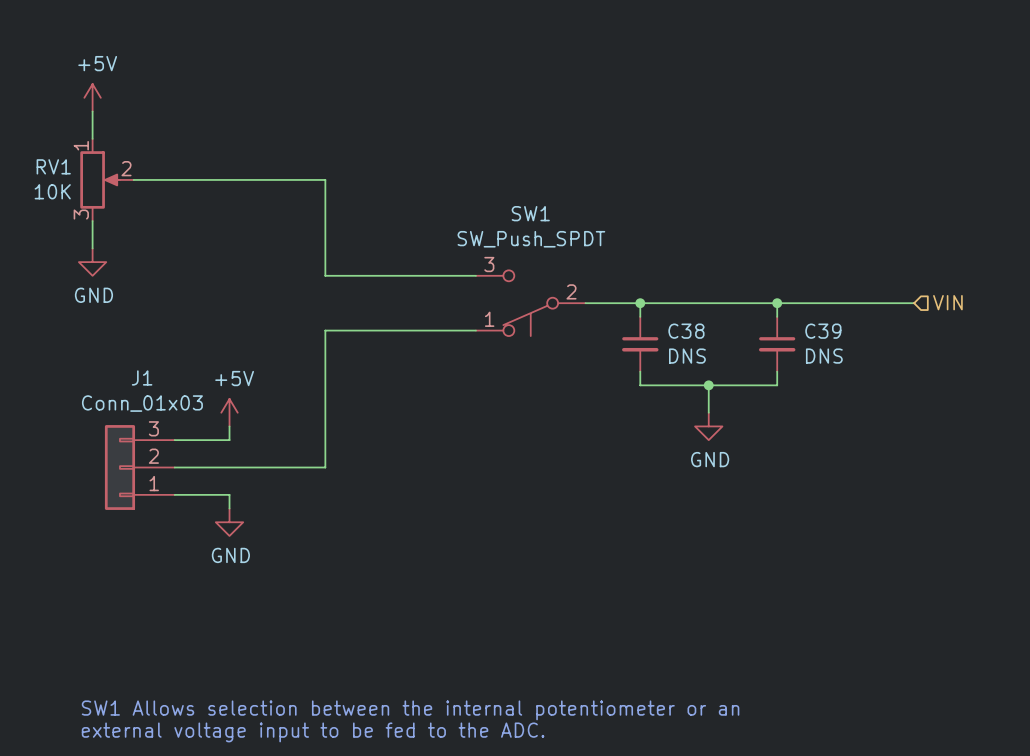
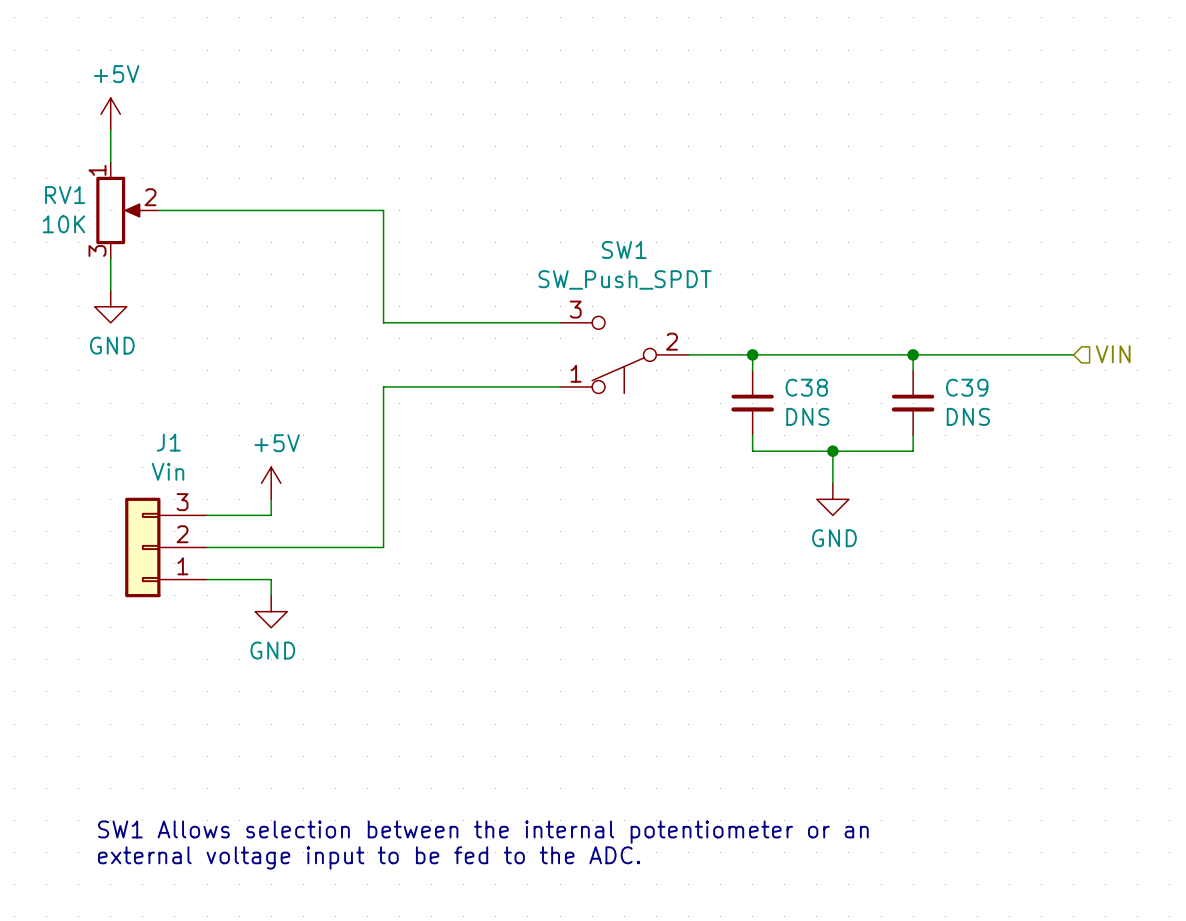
J1 value: Conn_01x03 (142, 403) -> Vin (167, 471)

